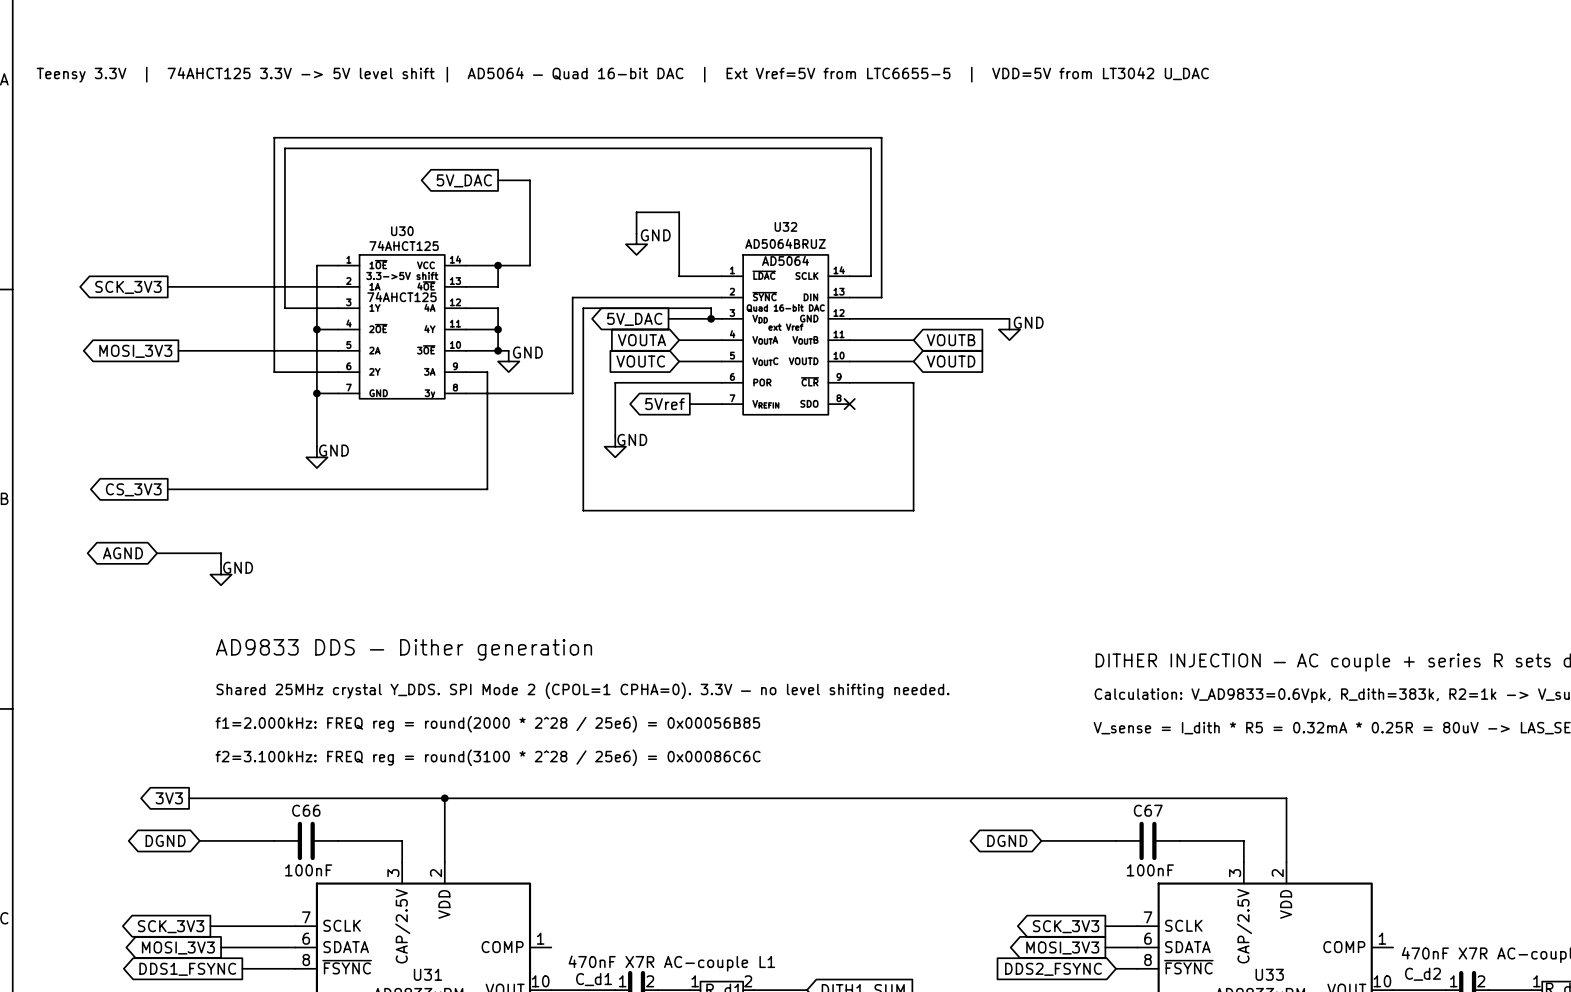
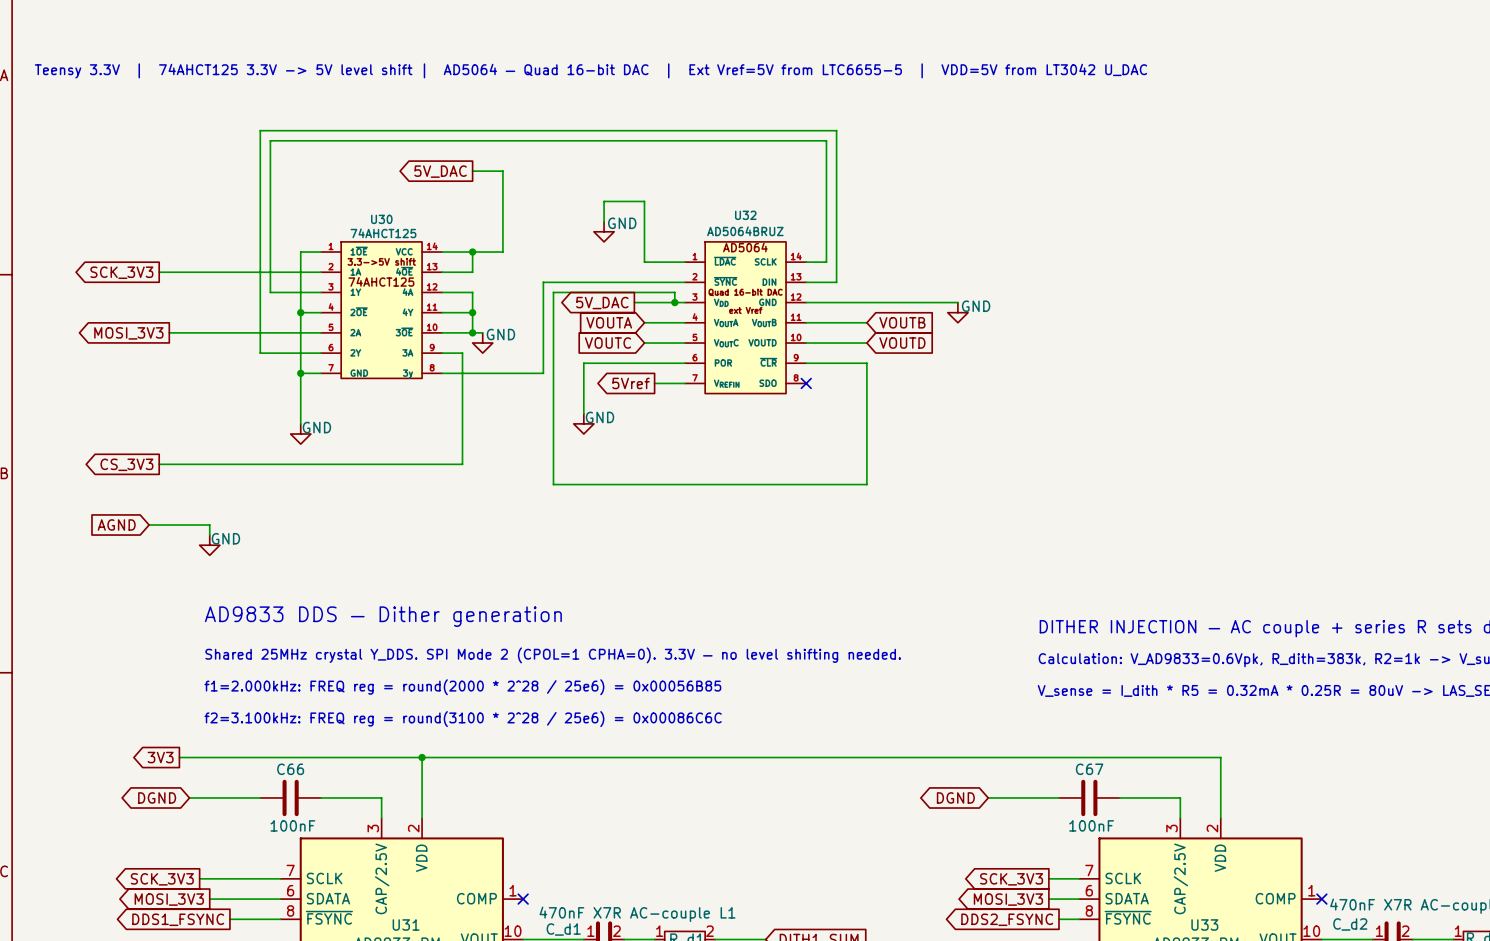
global label shape: bidirectional (122, 553) -> input (116, 524)
no-connect mark: none -> (523, 899)
no-connect mark: none -> (1321, 899)
global label shape: input (1053, 969) -> output (1007, 919)

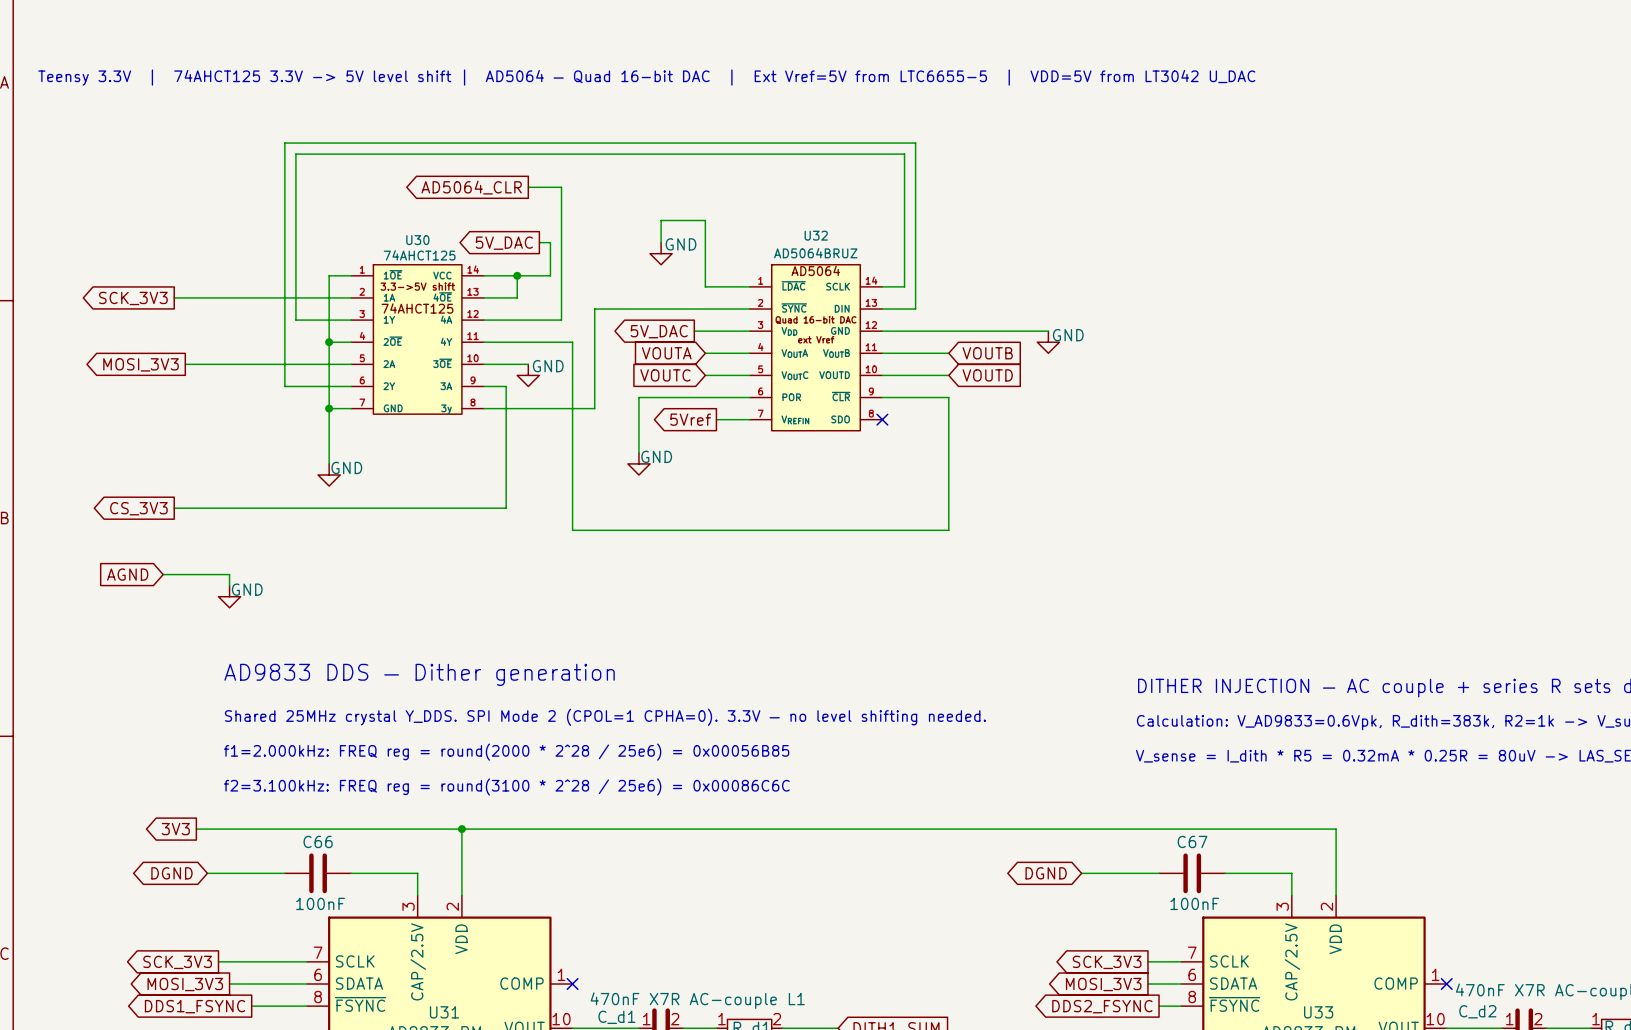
global label: none -> AD5064_CLR (471, 187)
global label position: 5V_DAC (440, 171) -> 5V_DAC (504, 243)
wire: (502, 171) (502, 221) -> (539, 242) (550, 242)
wire: (472, 292) (472, 332) -> (517, 320) (561, 320) (561, 187) (550, 187)
wire: (674, 302) (674, 292) (553, 292) (553, 484) -> (517, 342) (572, 342) (572, 530) (605, 530)
junction: (674, 302) -> none
junction: (472, 312) -> none
junction: (472, 332) -> none

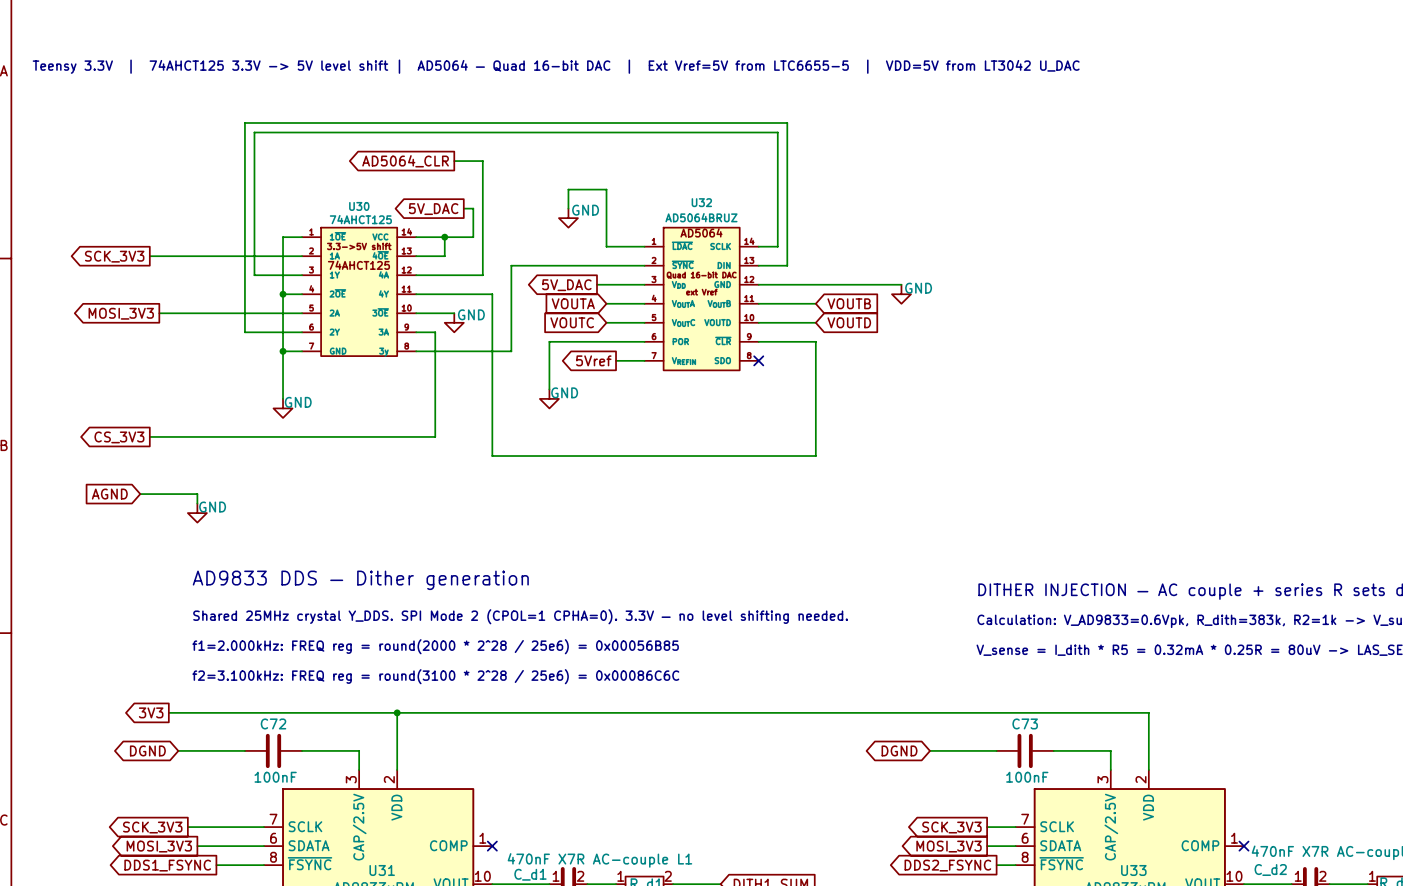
C66 name: C66 (318, 841) -> C72 (273, 723)
C67 name: C67 (1192, 841) -> C73 (1025, 723)

